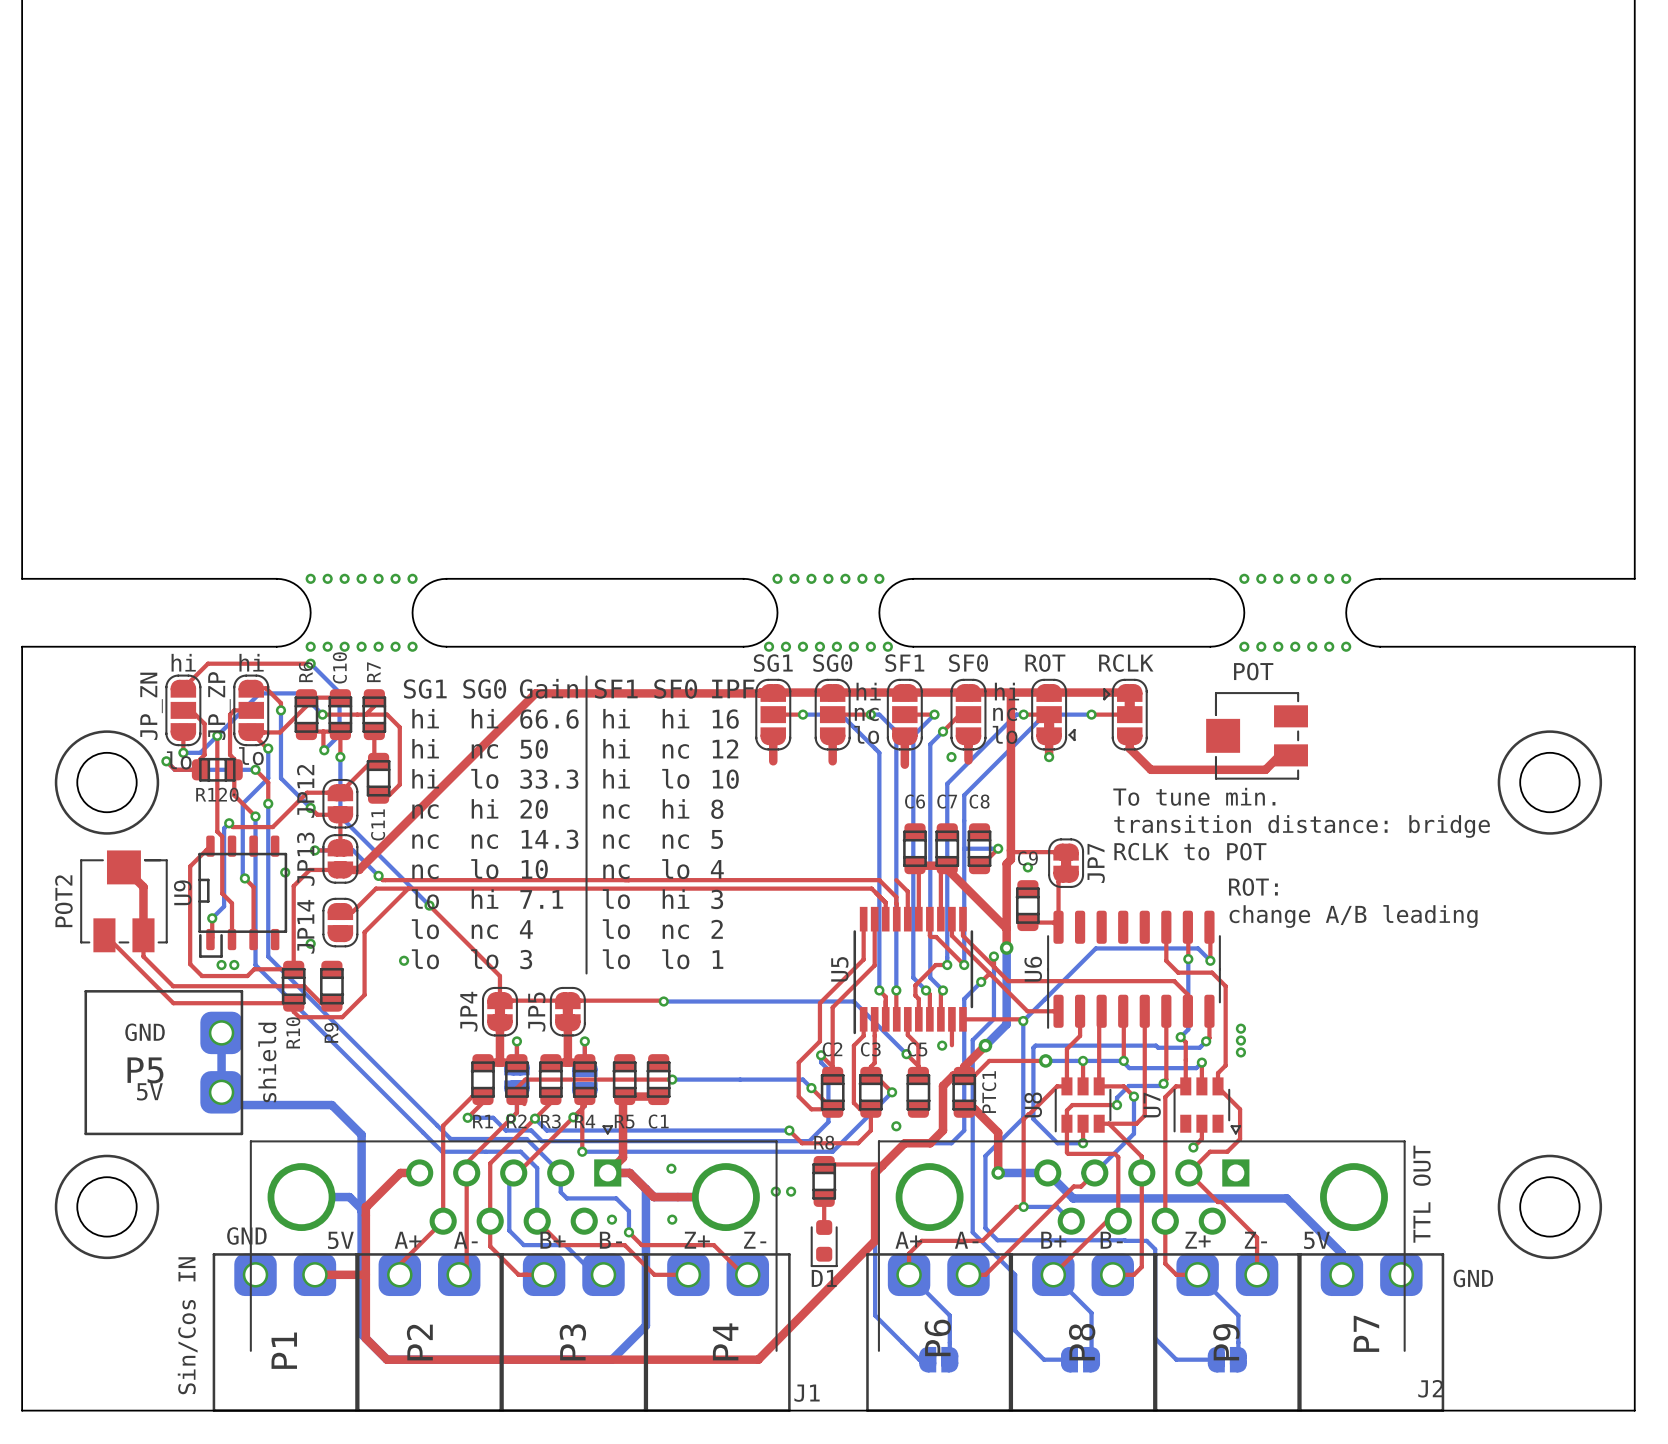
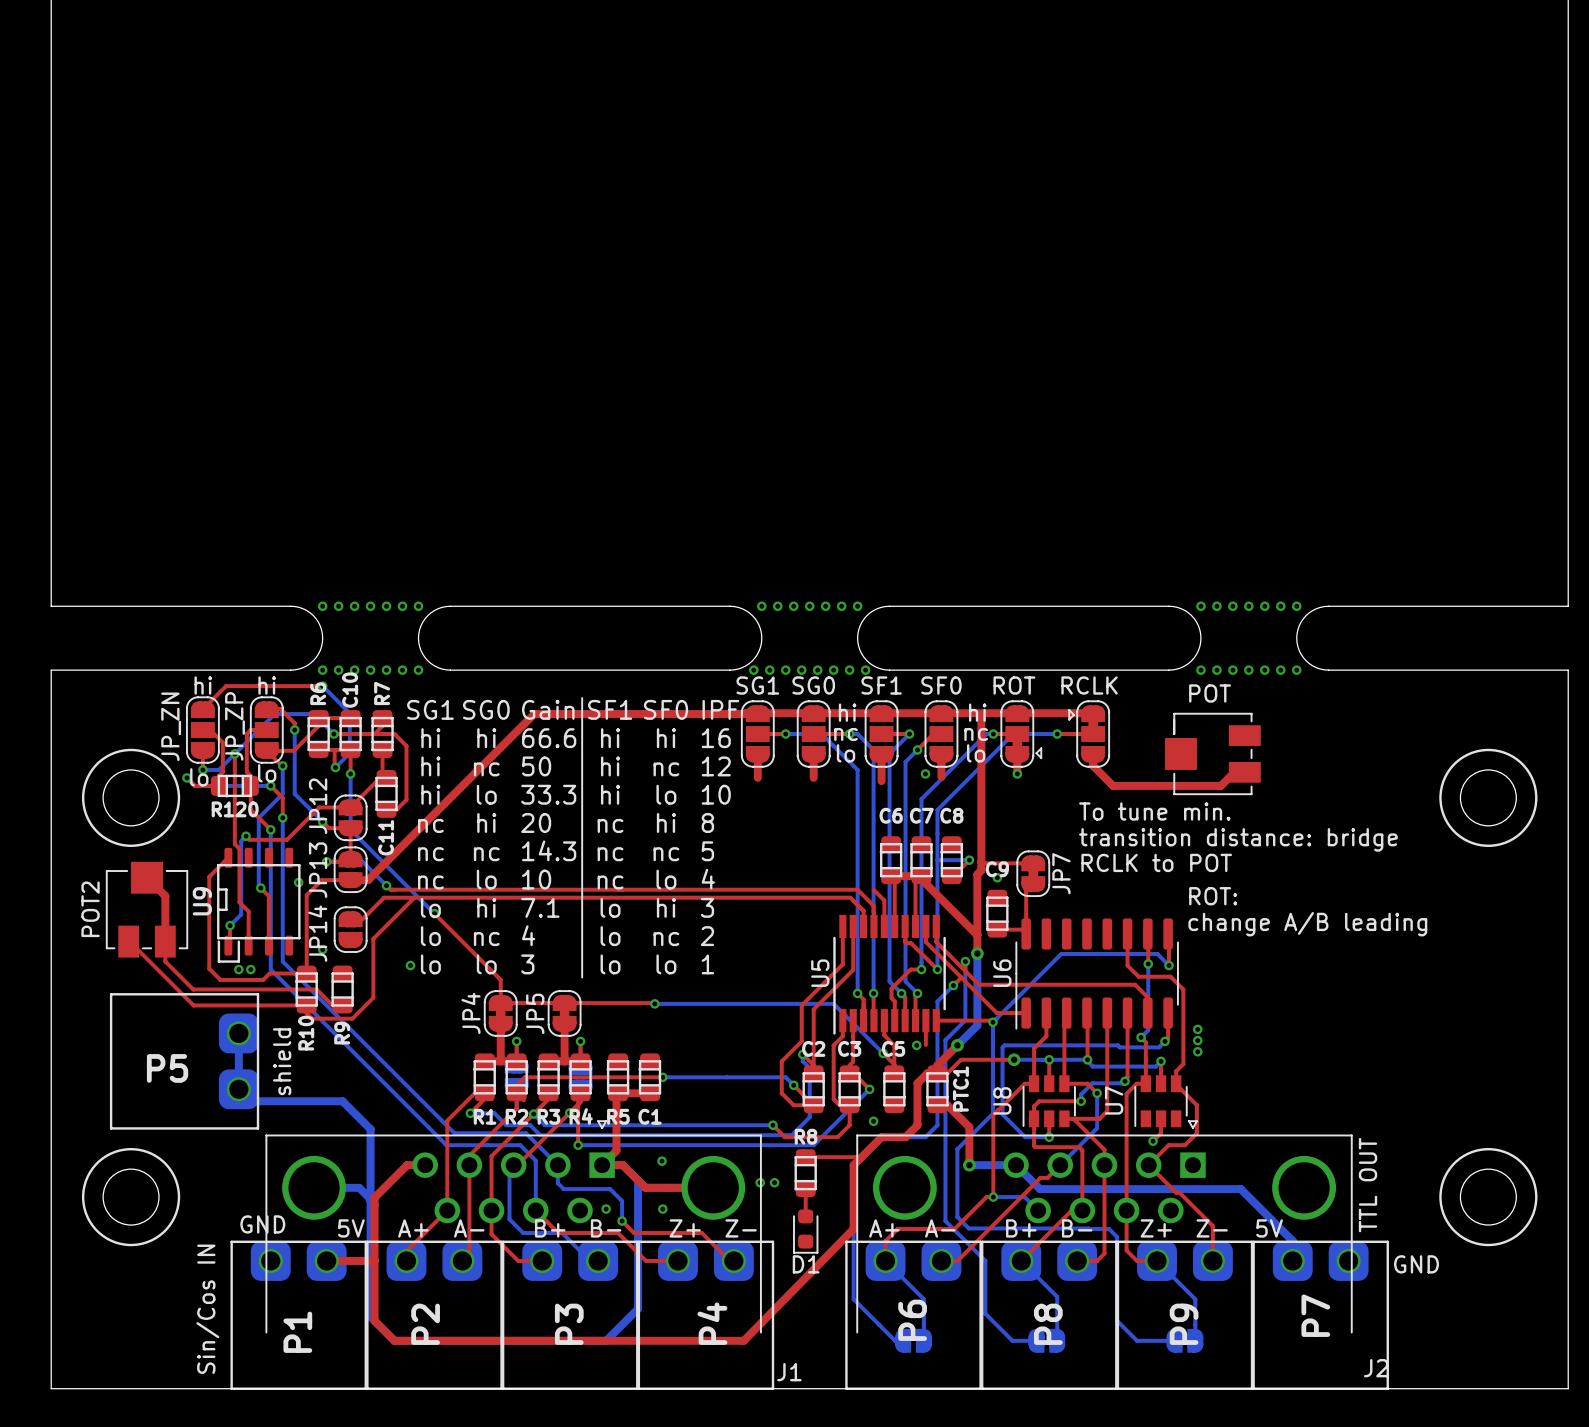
text: GND (145, 1032) -> none
text: 5V (149, 1091) -> none

